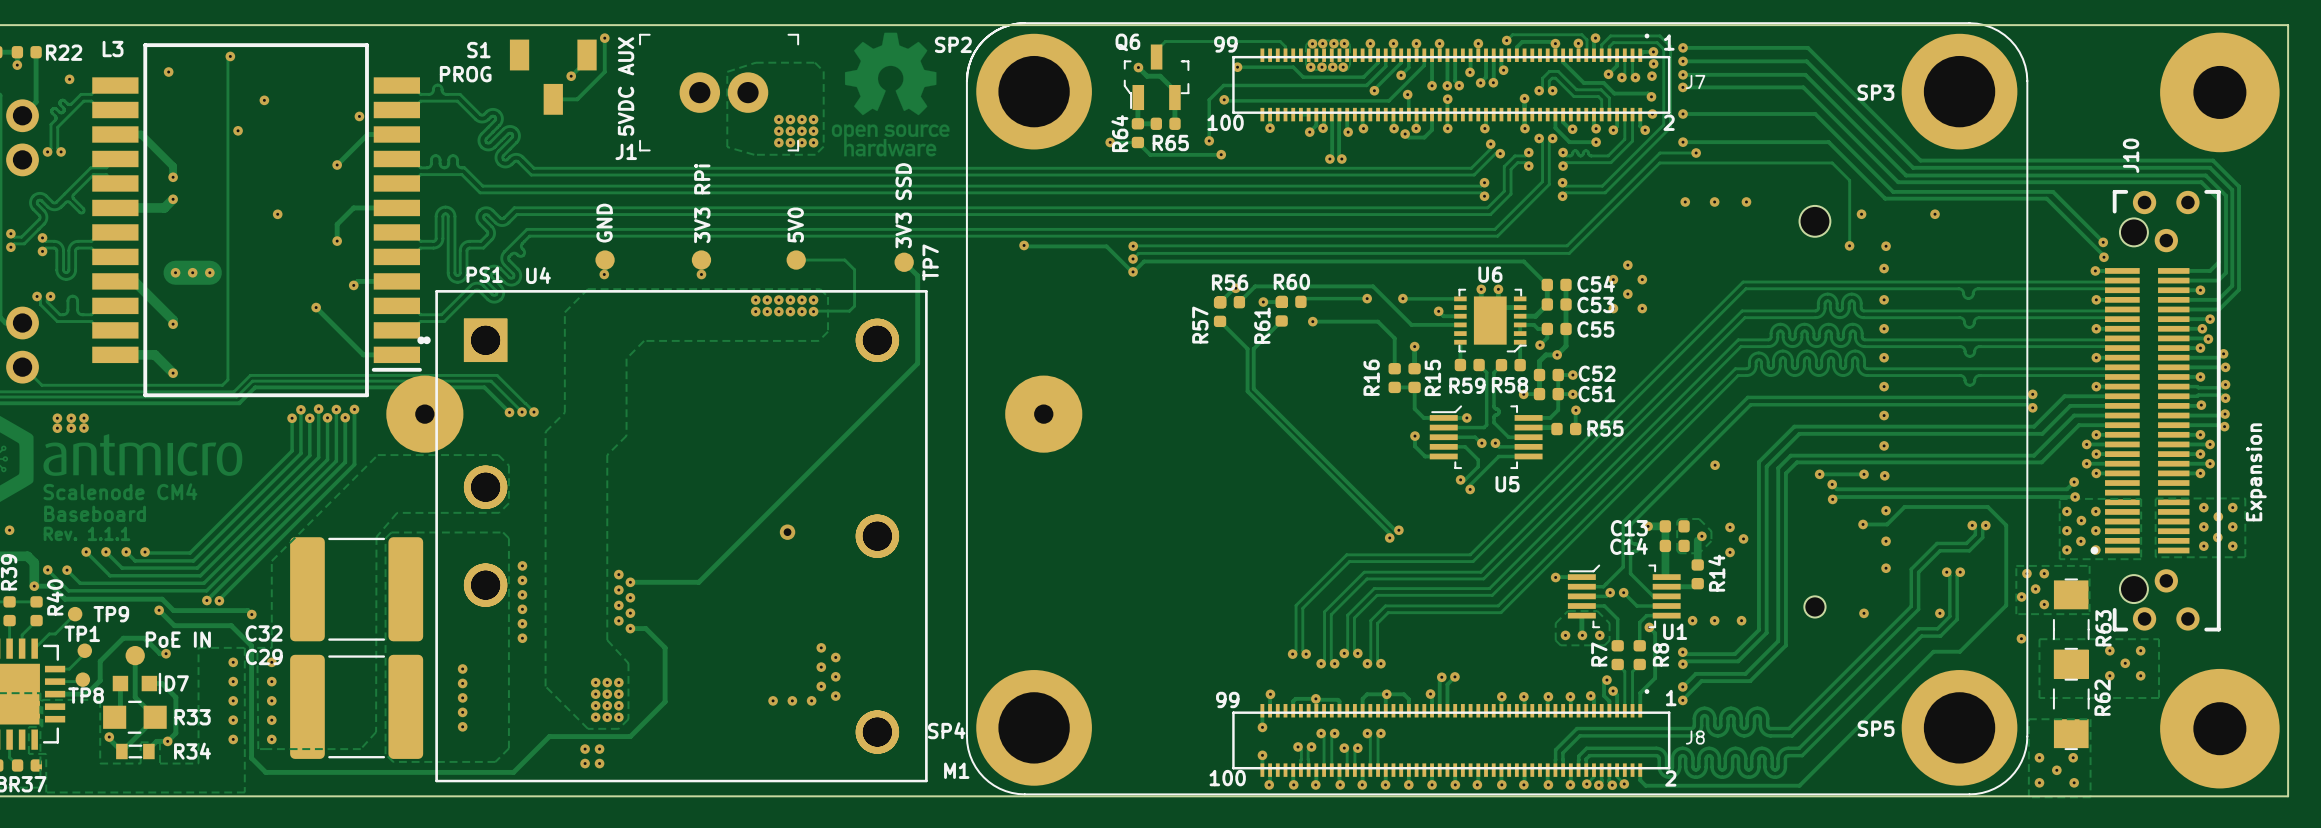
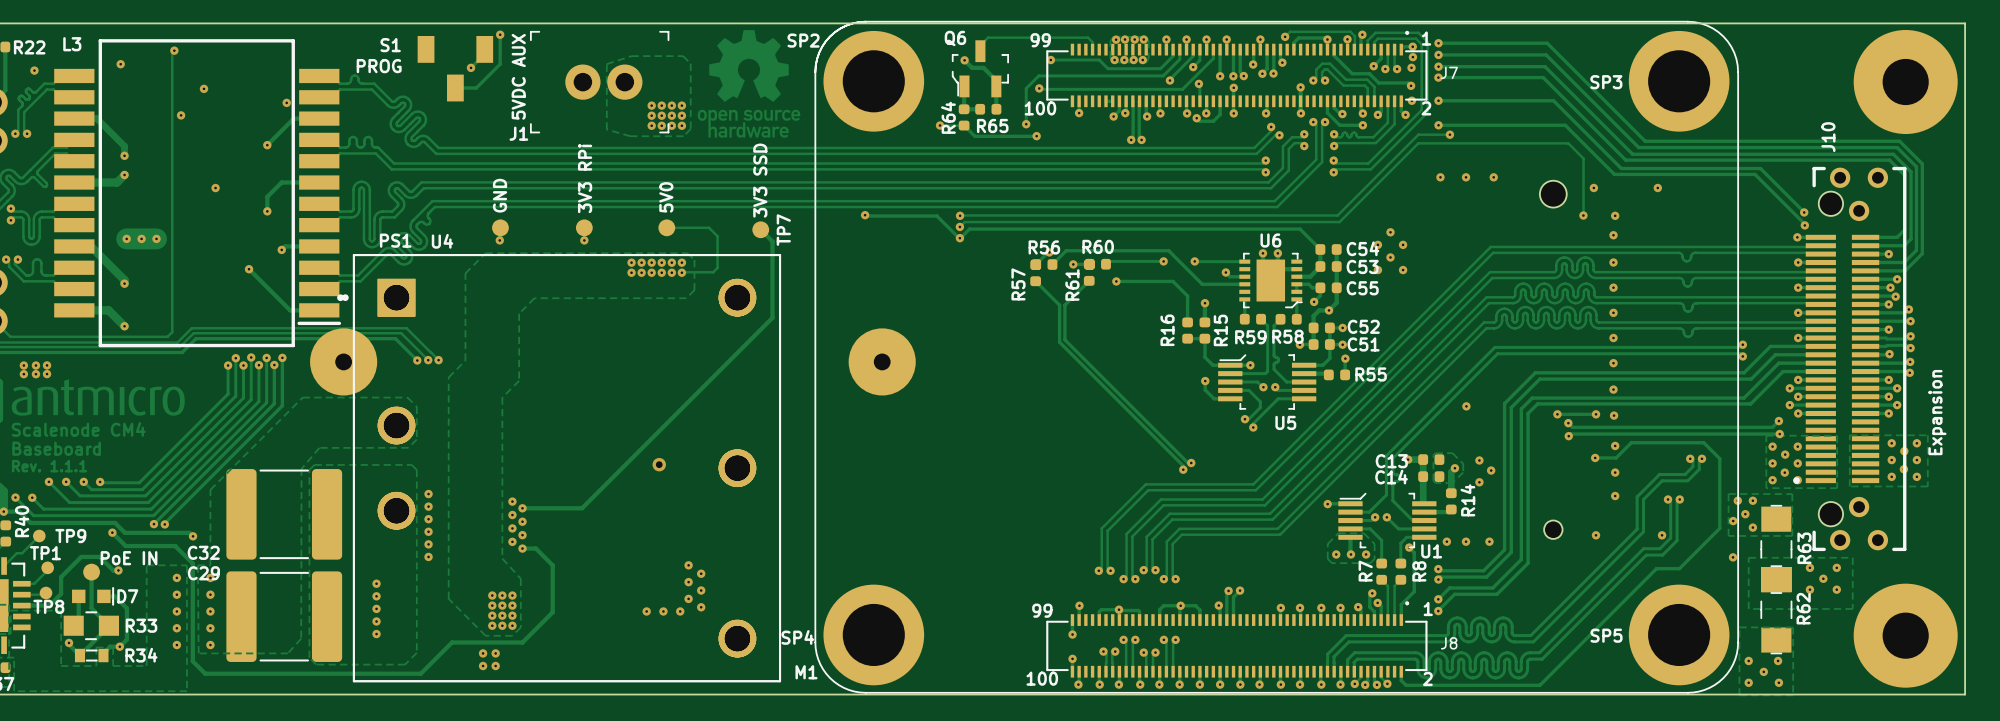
J7 footprint: [1232, 33, 1671, 122] -> [1046, 30, 1428, 108]
J8 footprint: [1232, 689, 1671, 777] -> [1046, 601, 1428, 678]

